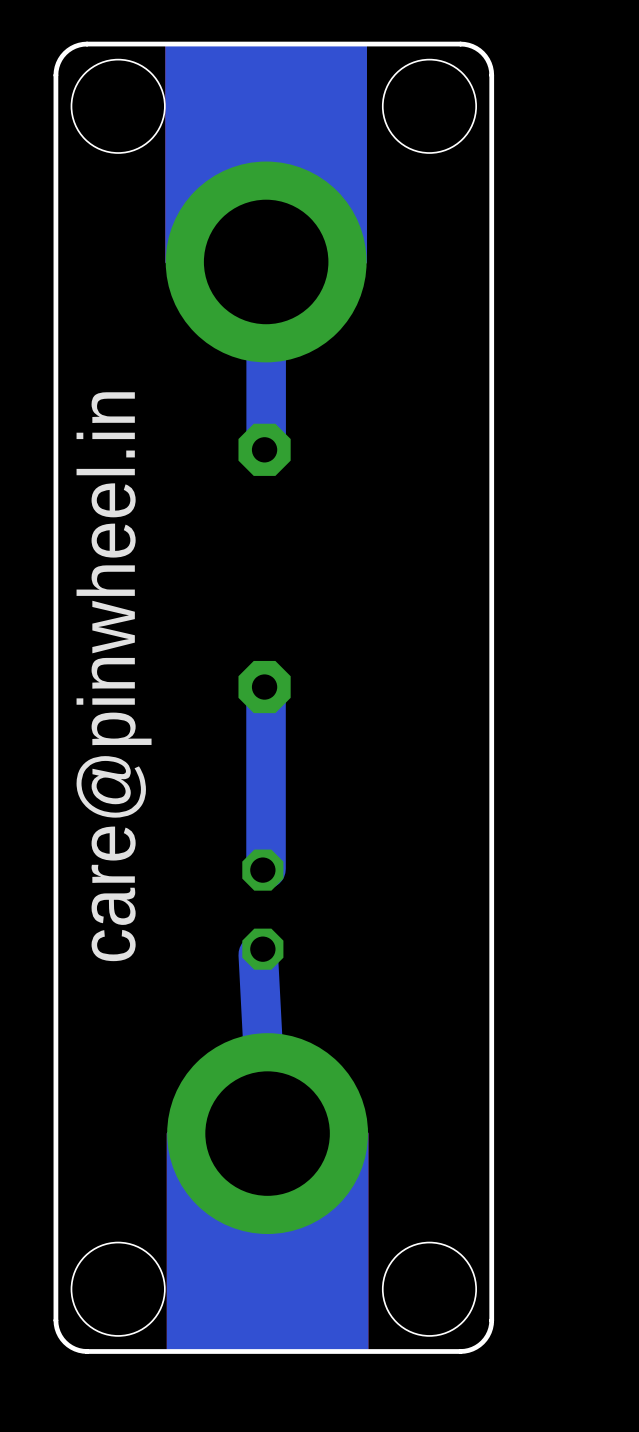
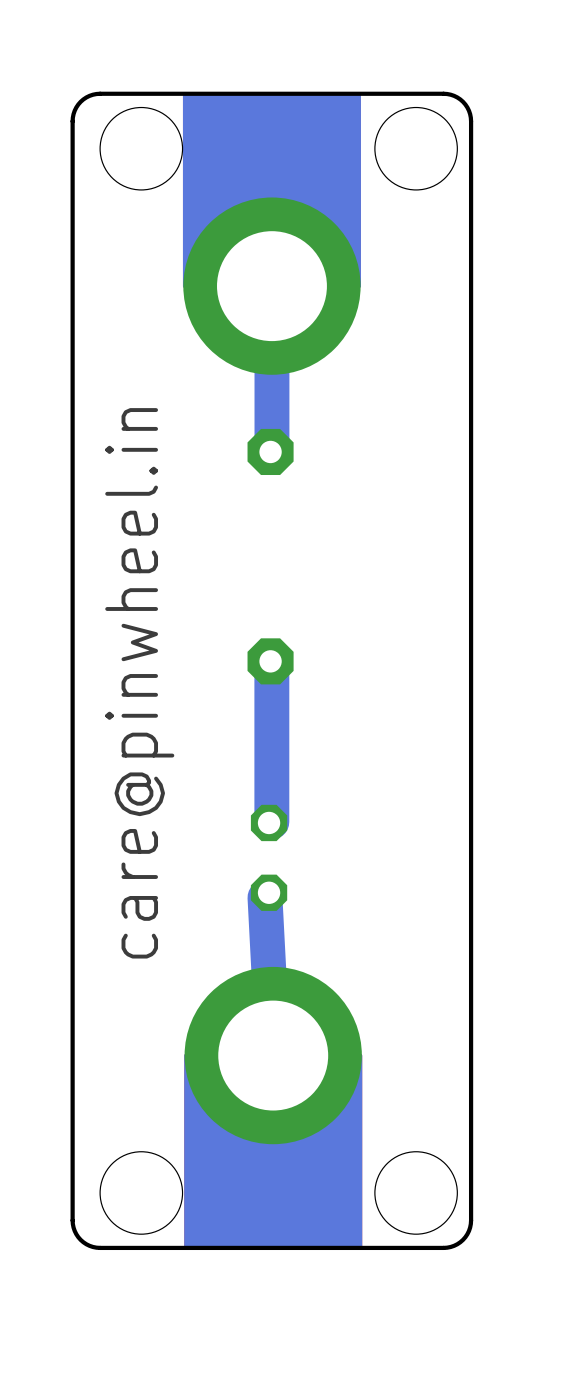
board edge: (87, 44) (75, 46) (65, 53) (58, 63) (55, 75) (55, 1320) (58, 1332) (65, 1342) (75, 1349) (87, 1351) -> (113, 93) (96, 94) (86, 97) (76, 107) (72, 121) (72, 1220) (76, 1234) (86, 1244) (96, 1247) (113, 1247)

